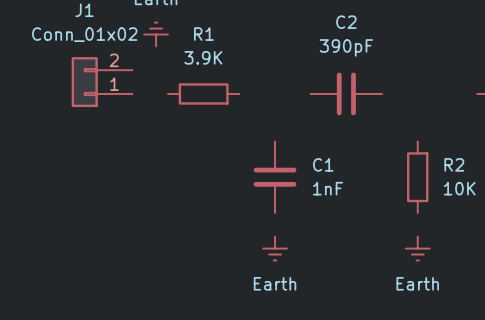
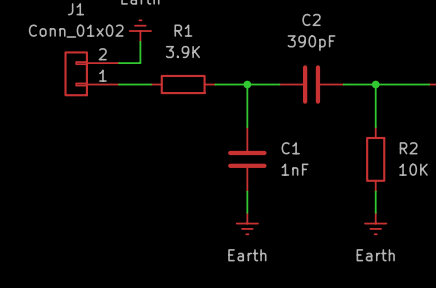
wire: none -> (140, 41) (140, 63) (118, 63)
wire: none -> (118, 84) (151, 84)
wire: none -> (215, 84) (279, 84)
wire: none -> (247, 84) (247, 127)
junction: none -> (247, 84)
wire: none -> (343, 84) (429, 84)
wire: none -> (375, 84) (375, 127)
junction: none -> (375, 84)
wire: none -> (247, 191) (247, 212)
wire: none -> (375, 191) (375, 212)

